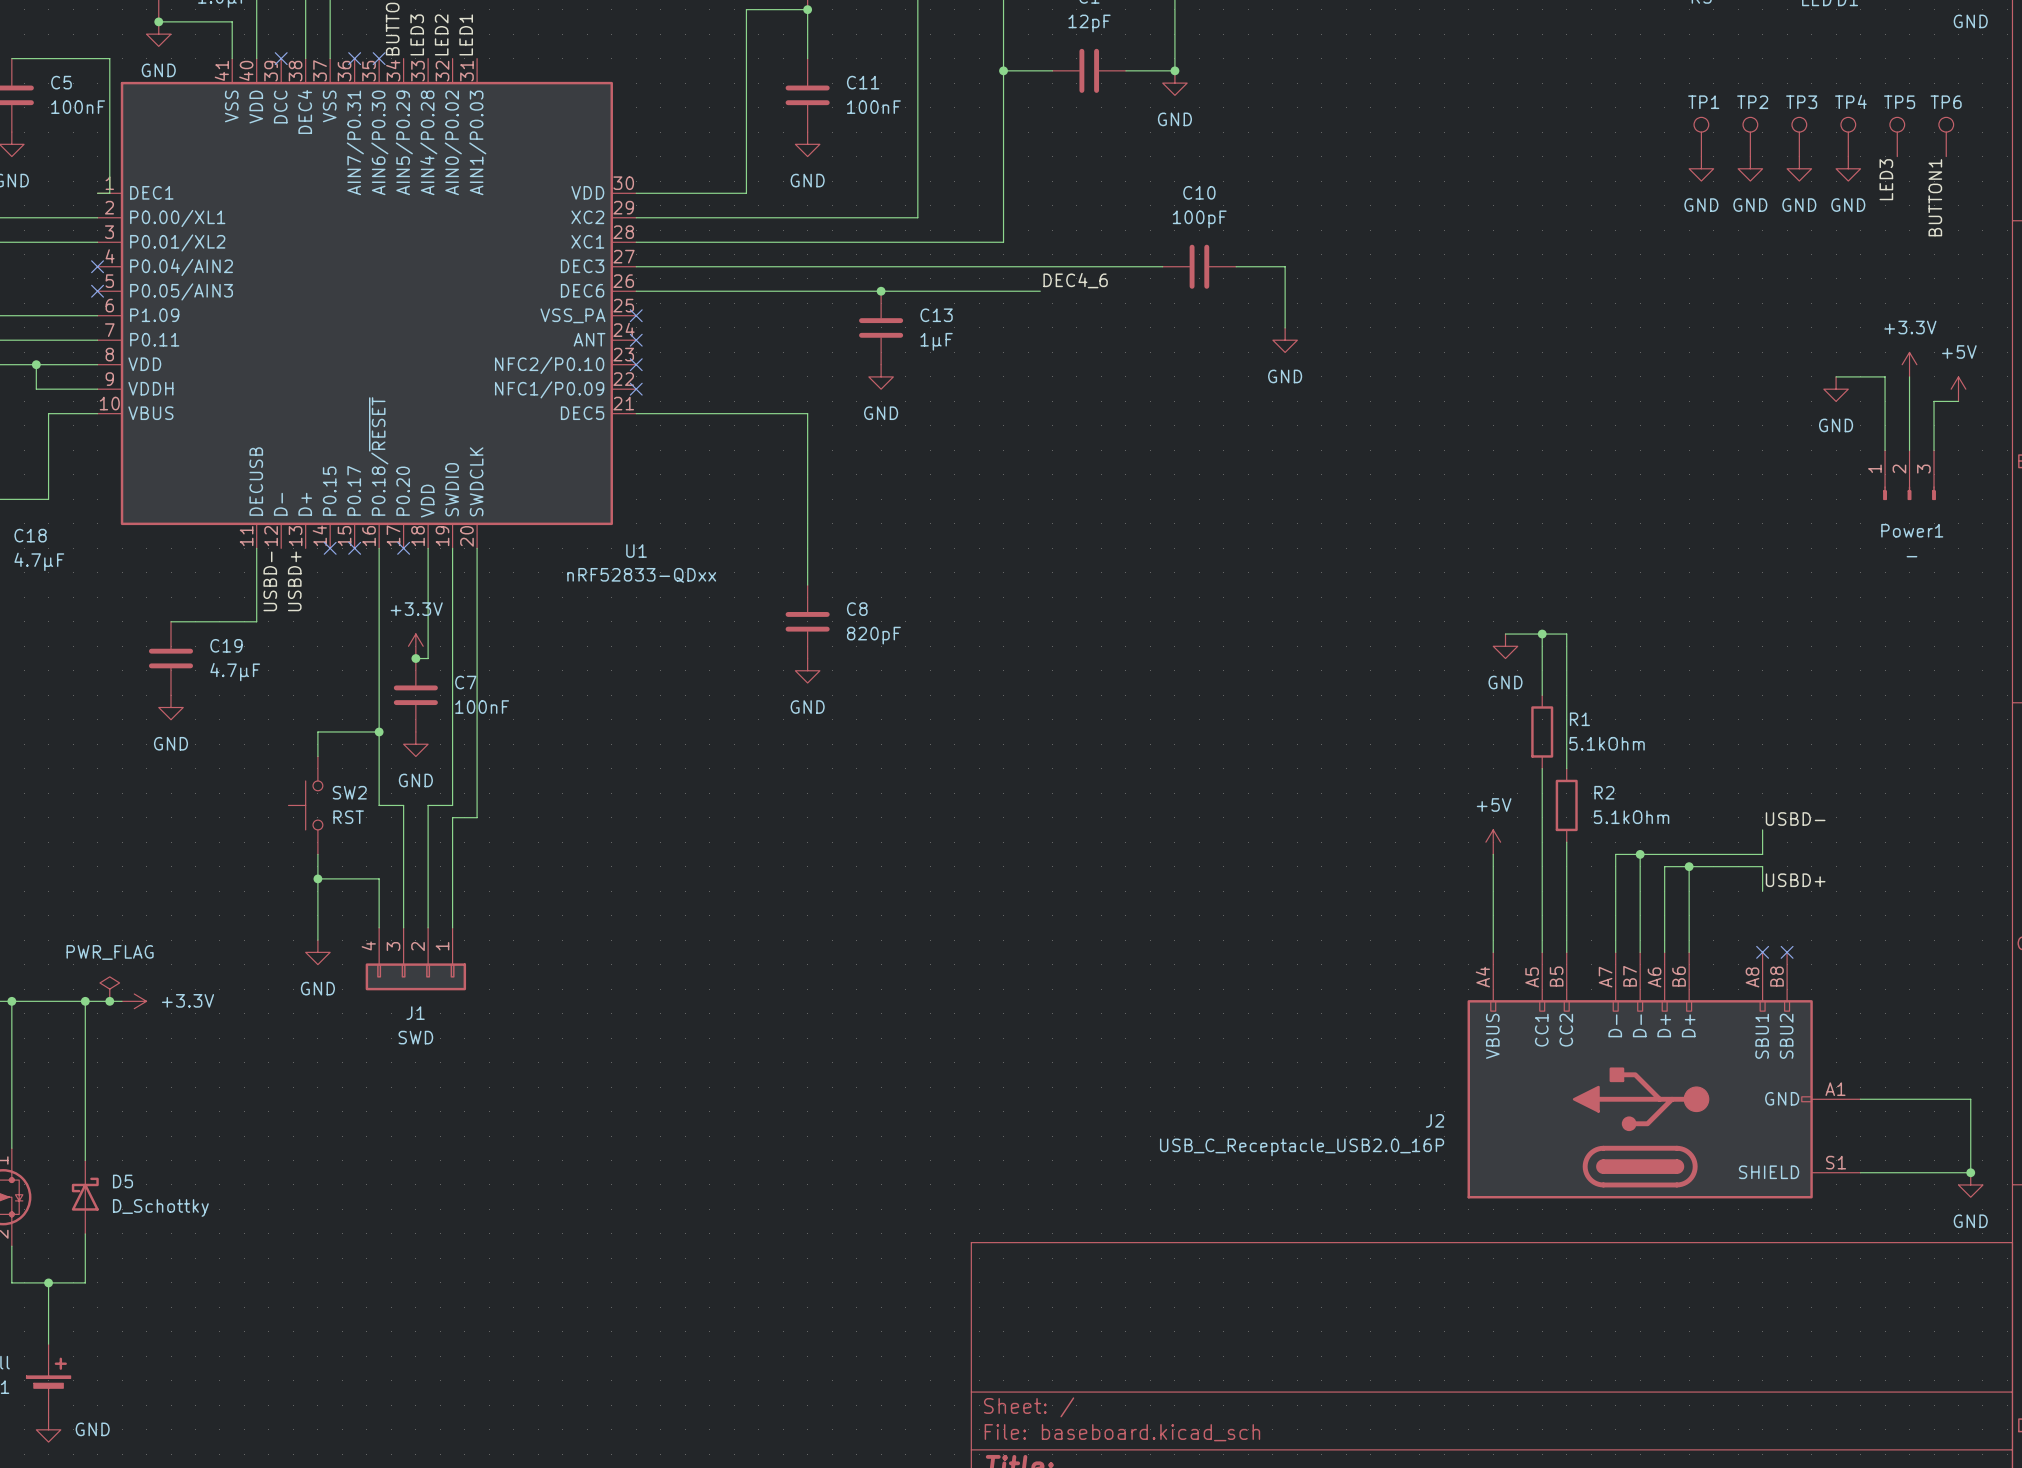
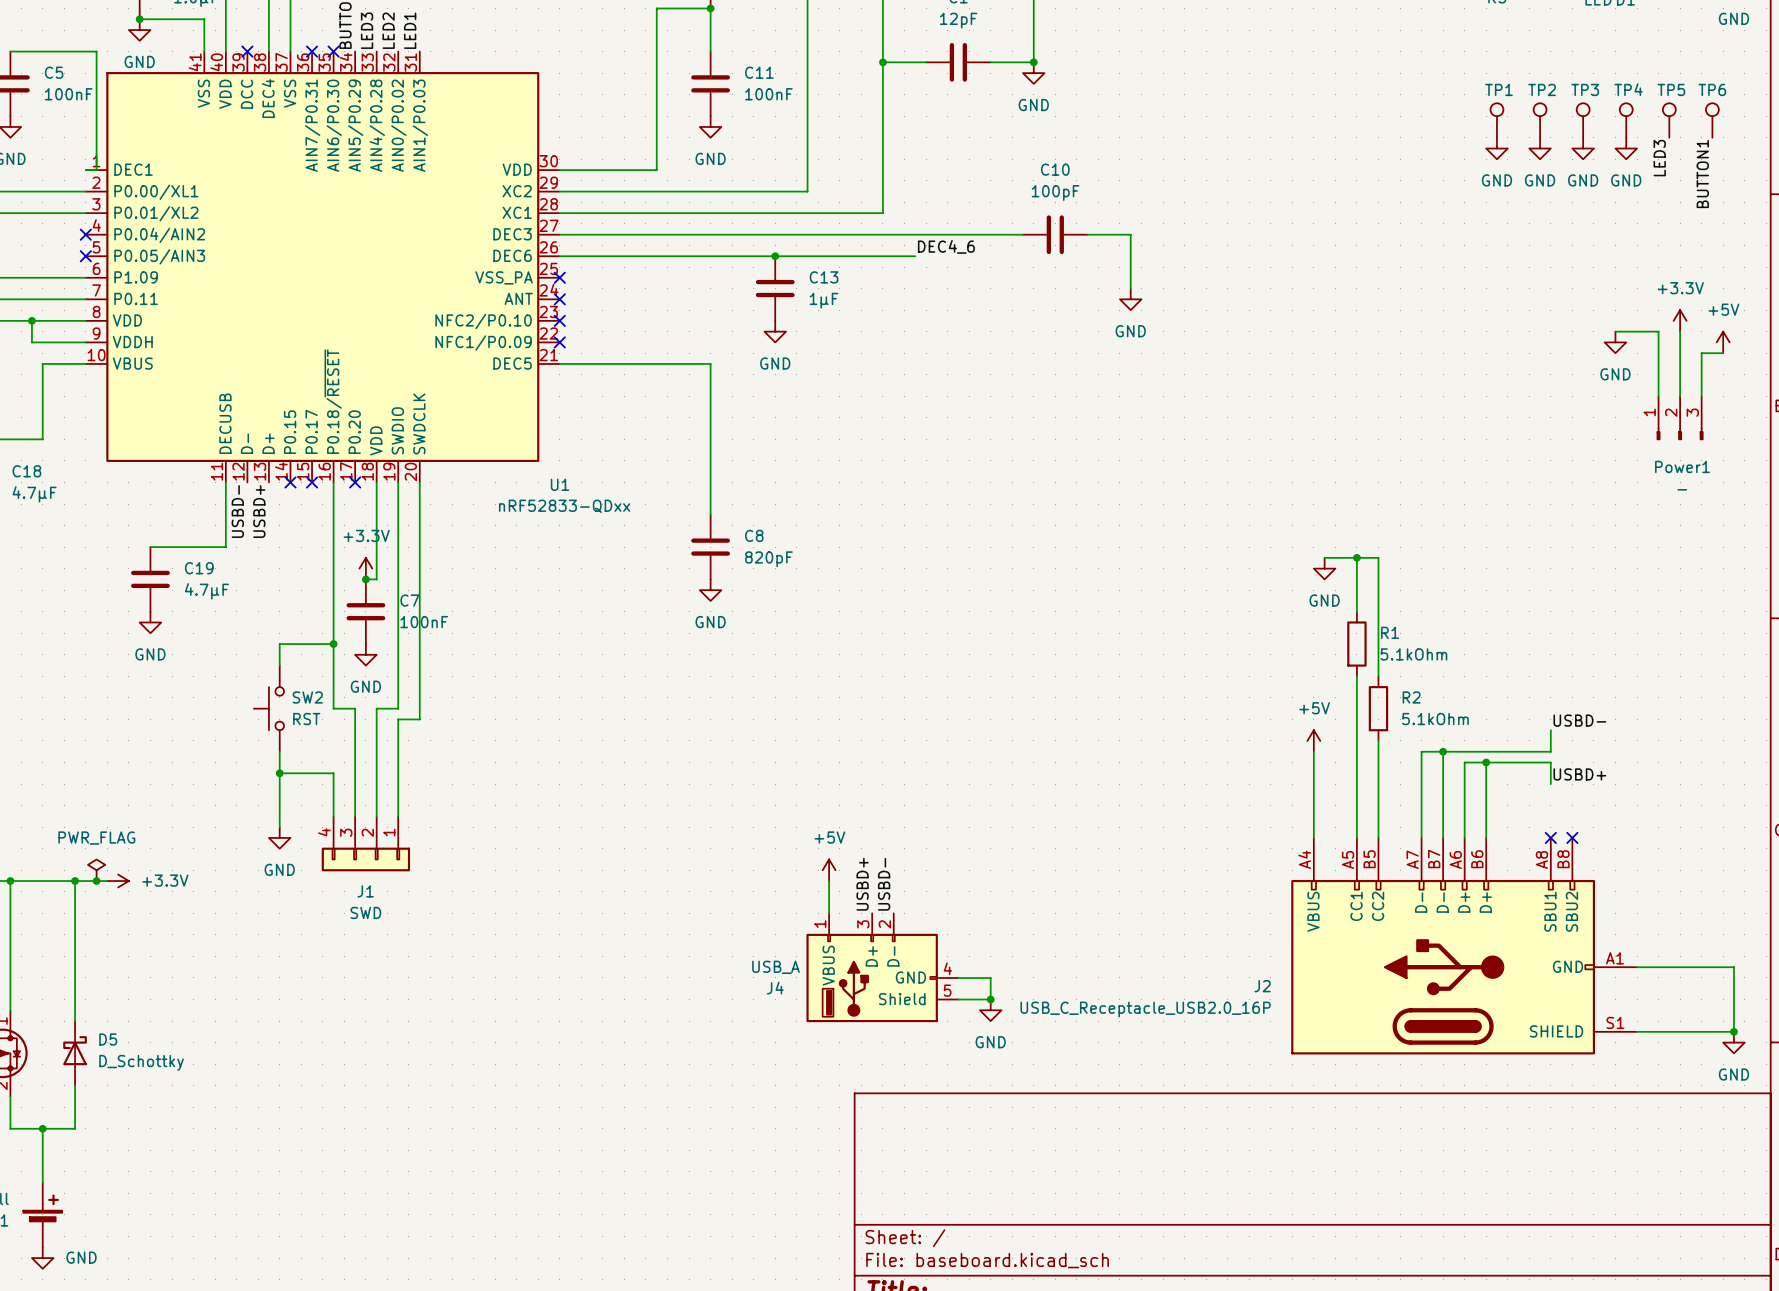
power symbol: none -> +5V (829, 870)
wire: none -> (829, 881) (829, 913)
label: none -> USBD+ (862, 884)
label: none -> USBD- (884, 884)
J4: none -> USB_A (882, 967)
wire: none -> (958, 977) (990, 977) (990, 999) (958, 999)
junction: none -> (990, 999)
power symbol: none -> GND (990, 1010)

